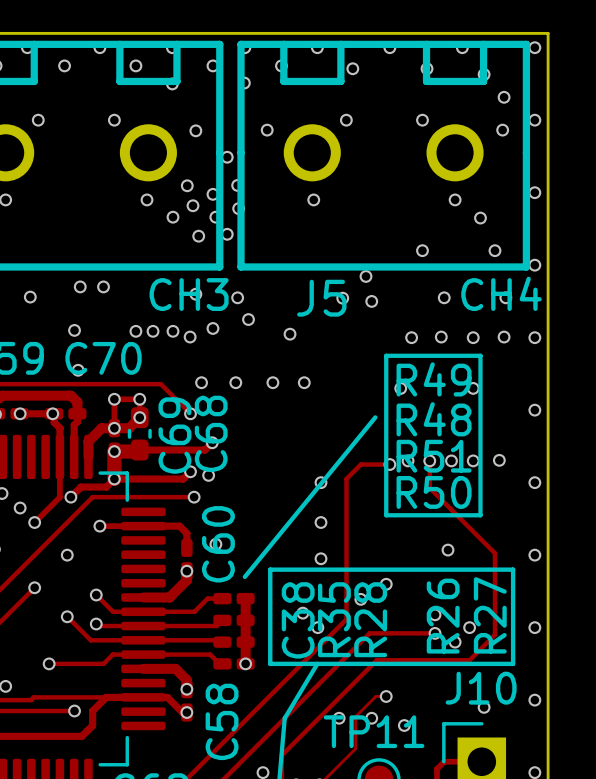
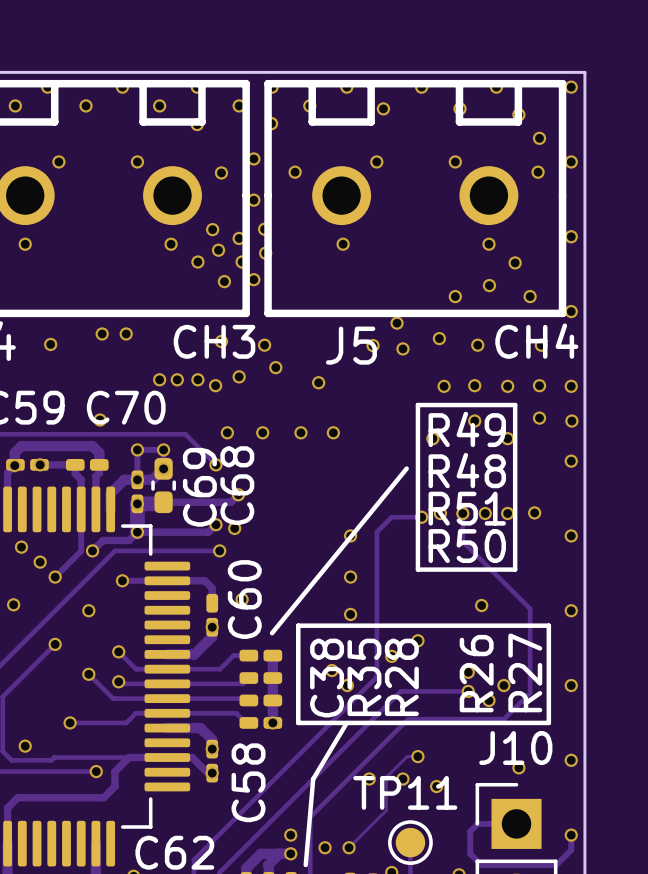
via: none -> (253, 158)
via: none -> (489, 285)
via: none -> (439, 338)
via: (74, 330) -> none
via: none -> (539, 418)
via: none -> (474, 421)
via: none -> (571, 421)
via: (52, 413) -> none

